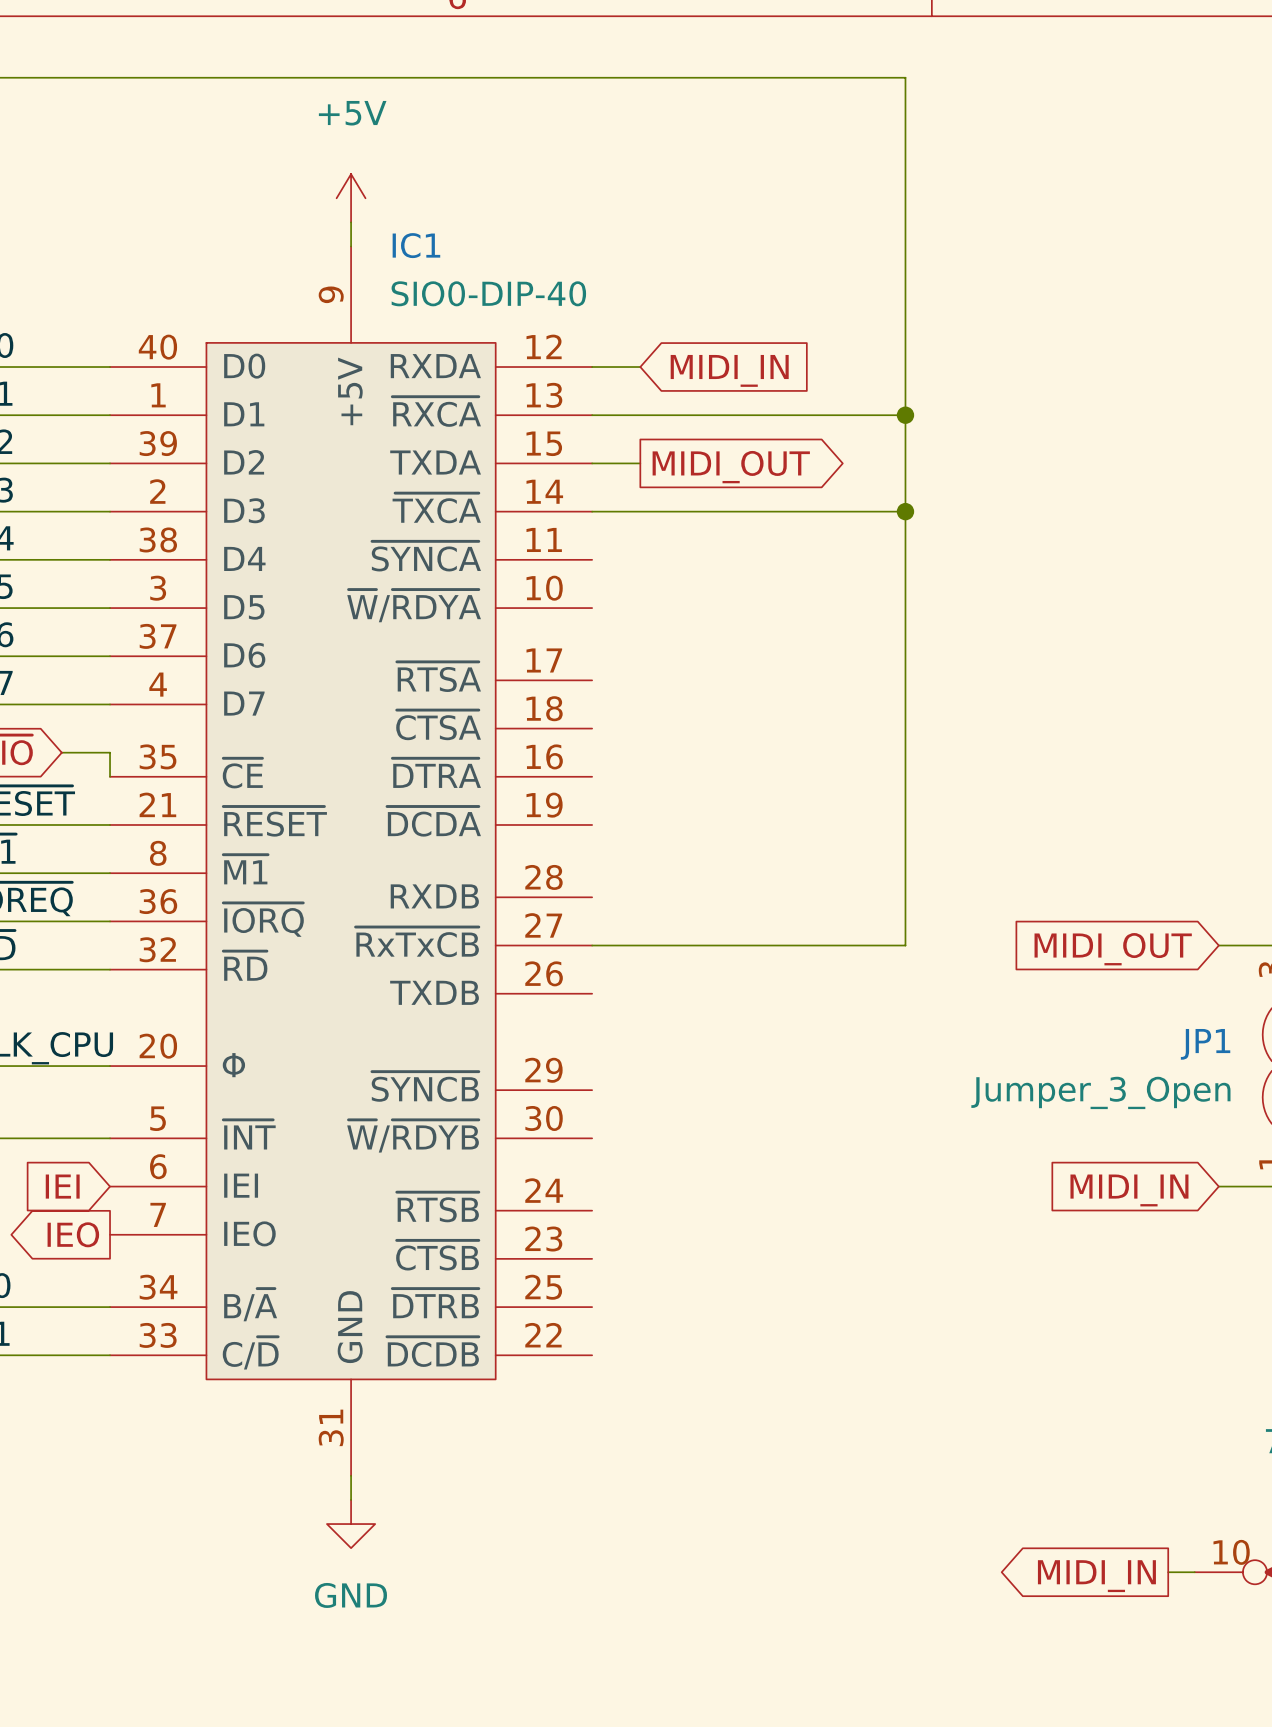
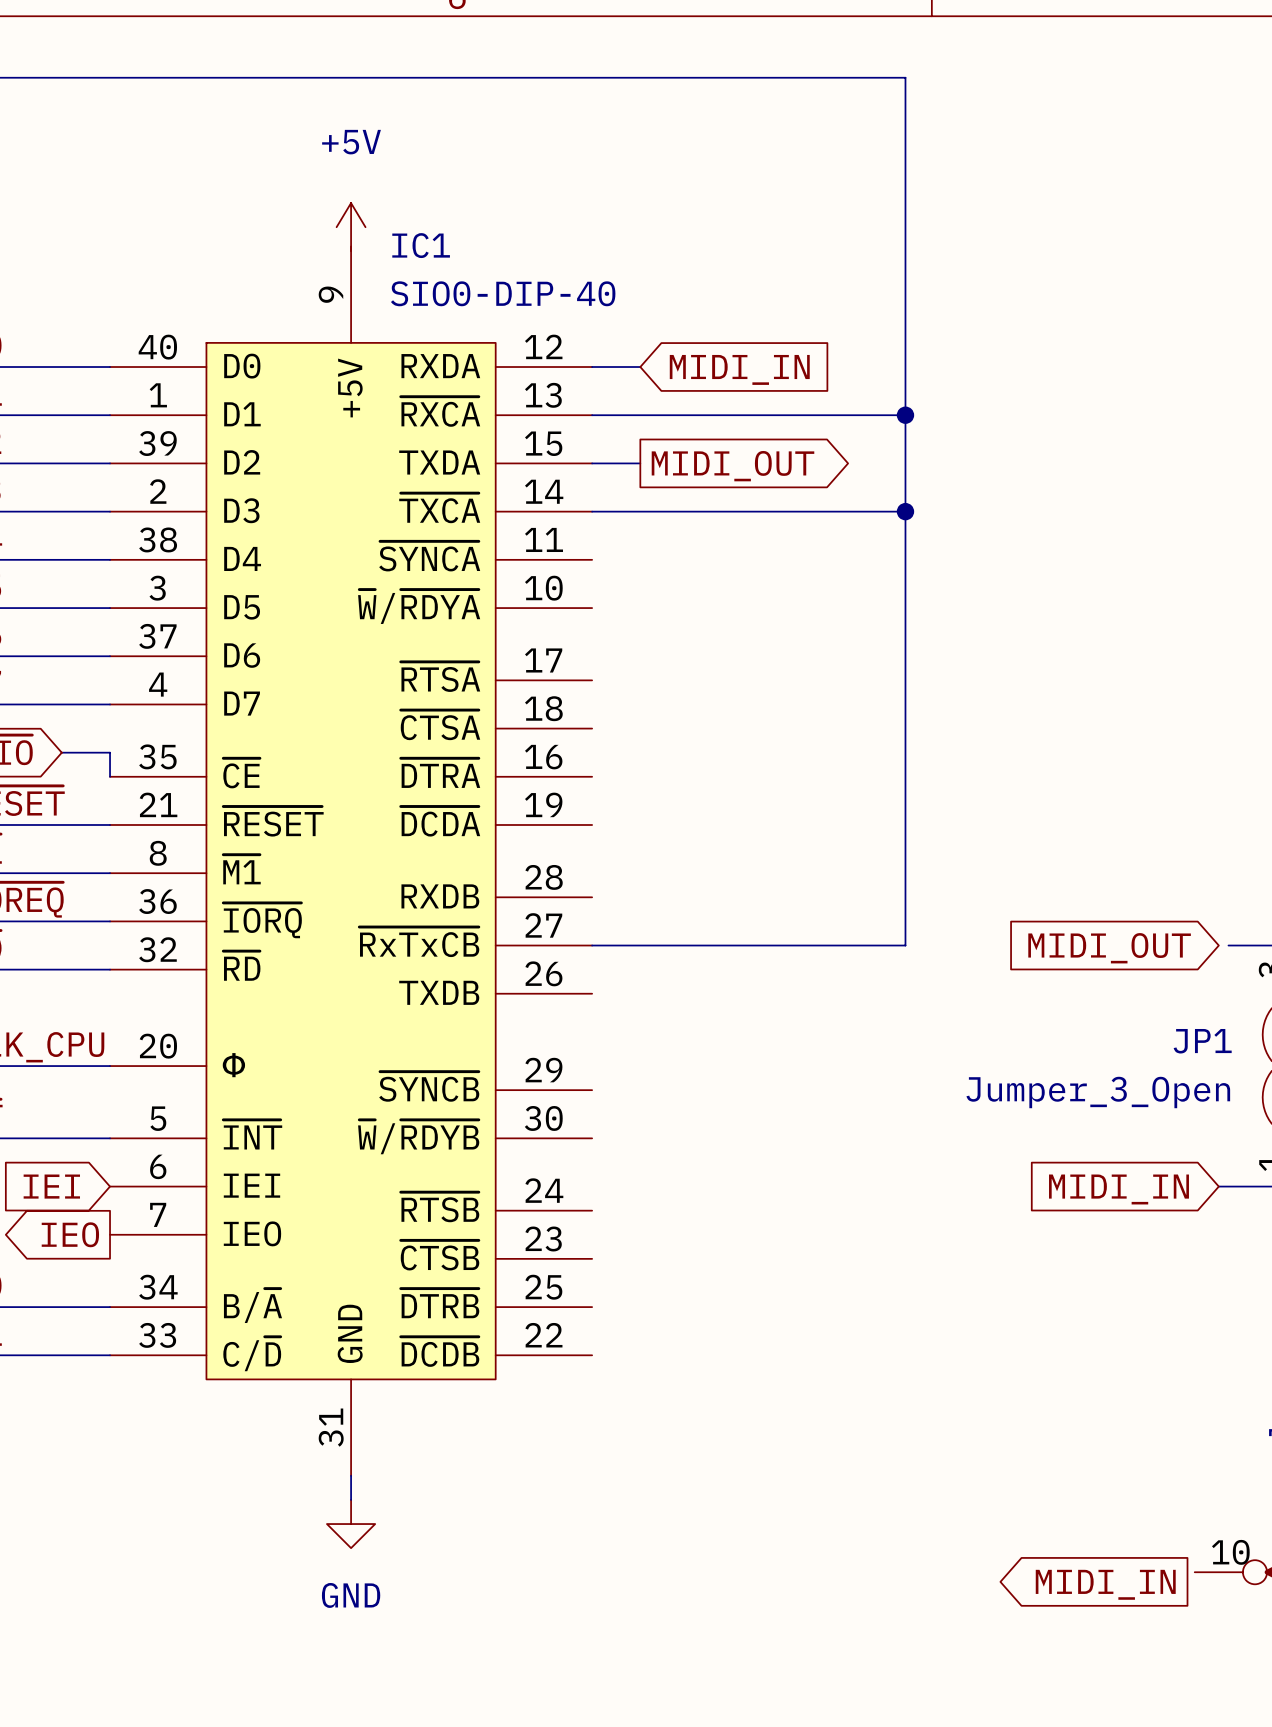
power symbol position: +5V (351, 198) -> +5V (351, 227)
wire: (1218, 945) (1228, 945) -> none
wire: (1168, 1572) (1194, 1572) -> none
global label position: MIDI_IN (1096, 1576) -> MIDI_IN (1105, 1584)

